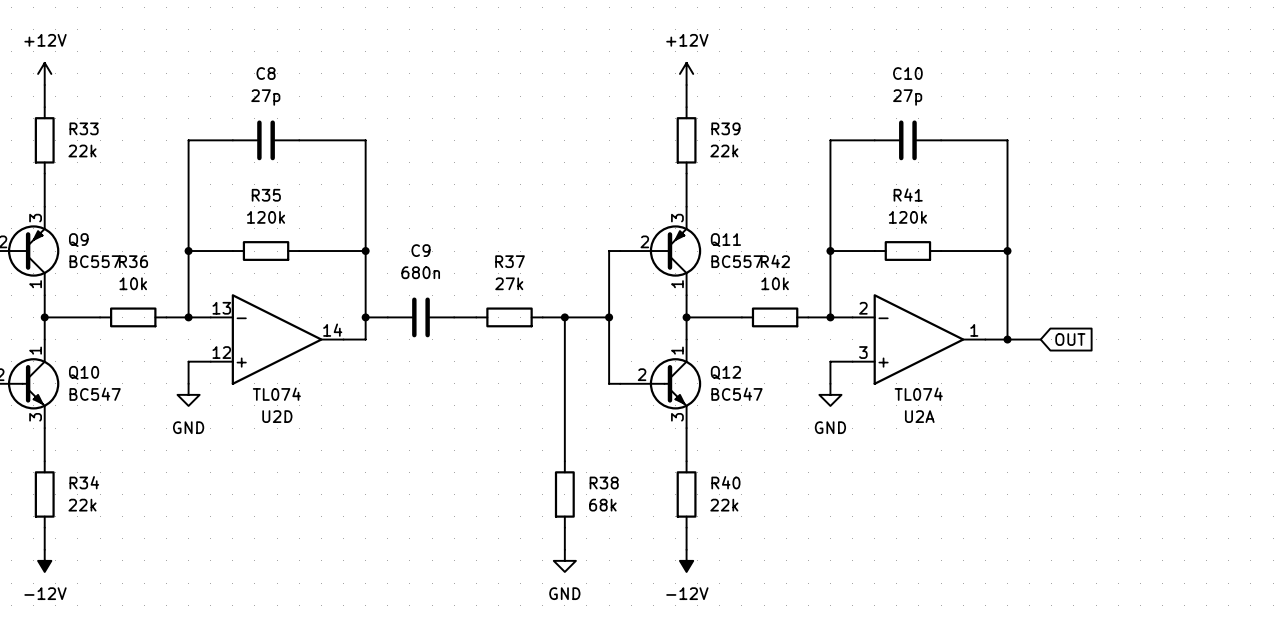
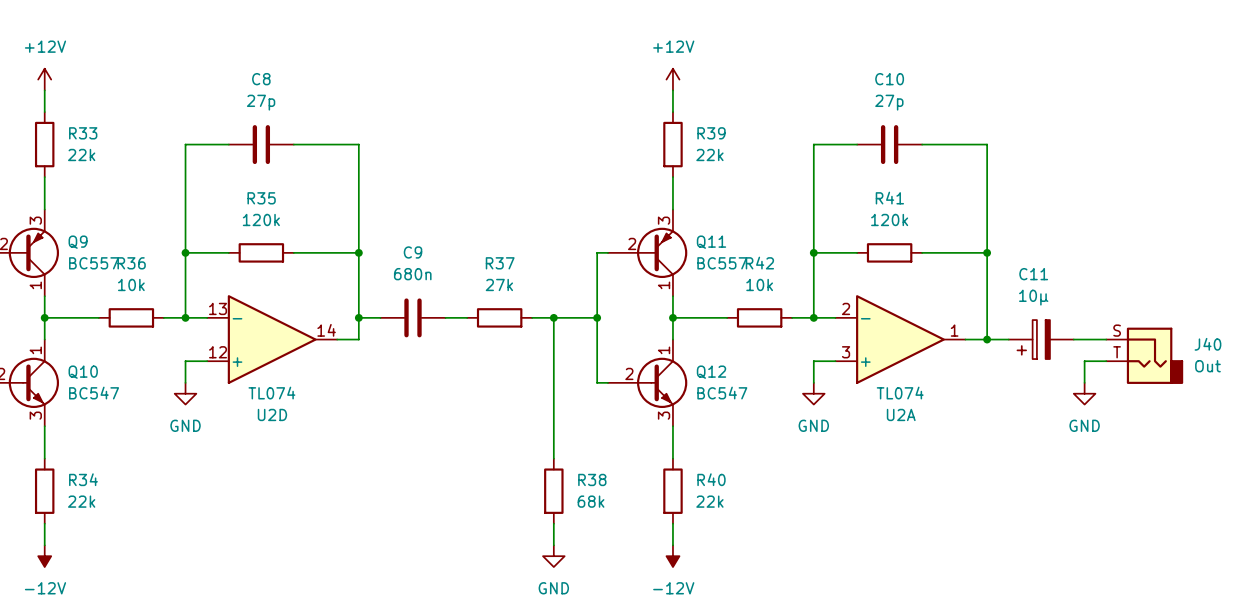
C11: none -> 10µ (1041, 339)
global label: OUT (1070, 339) -> none
wire: none -> (1073, 339) (1106, 339)
J40: none -> Out (1144, 355)
wire: none -> (1106, 361) (1084, 361) (1084, 382)
power symbol: none -> GND (1084, 393)

